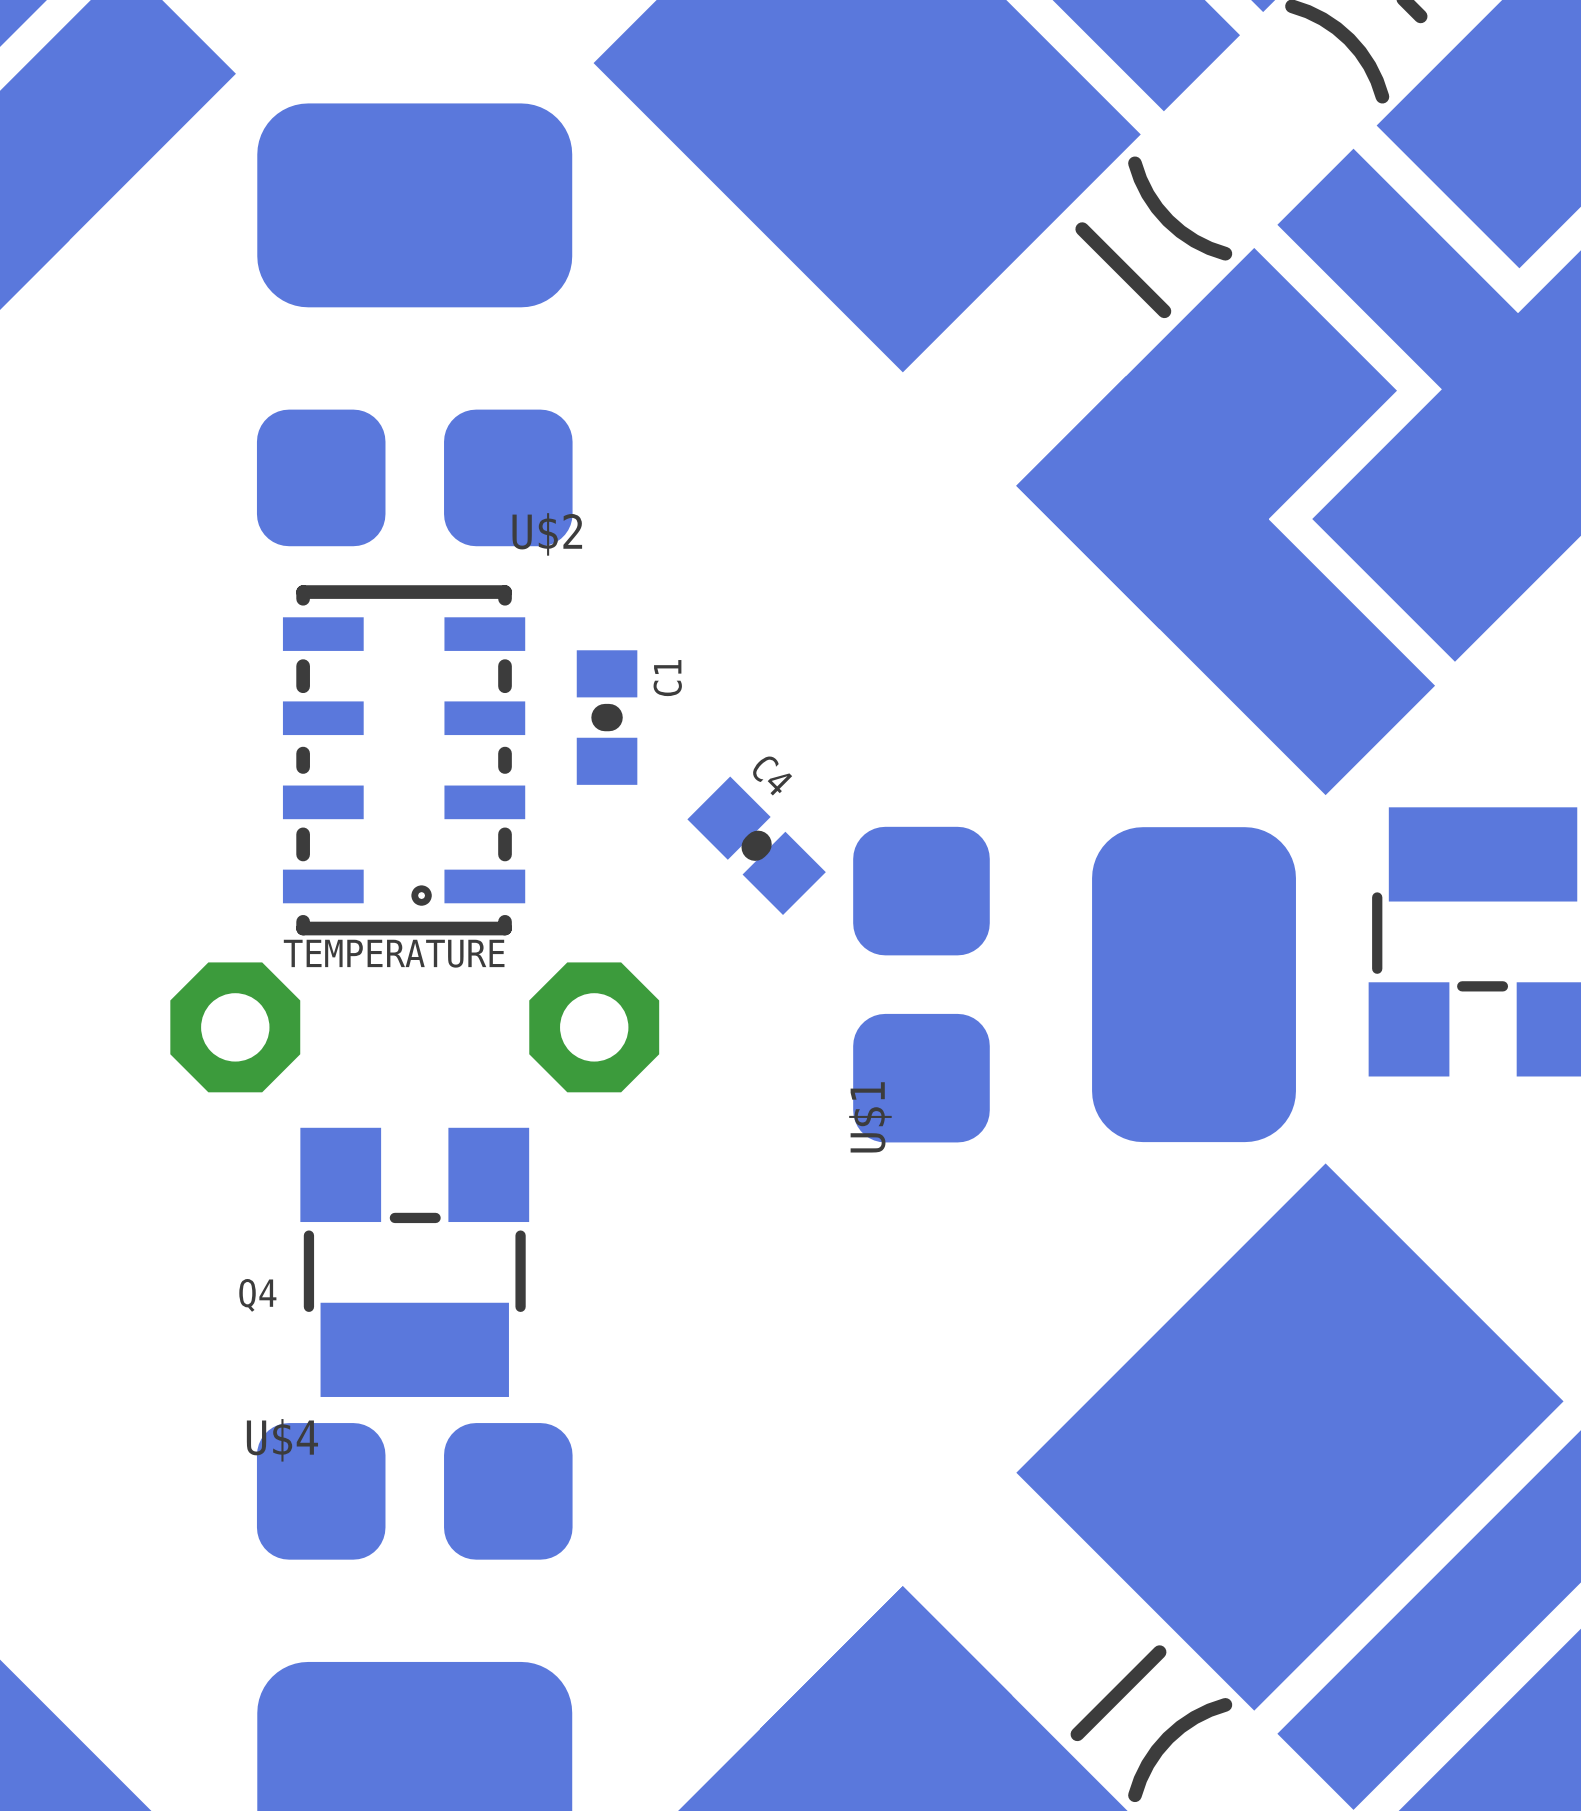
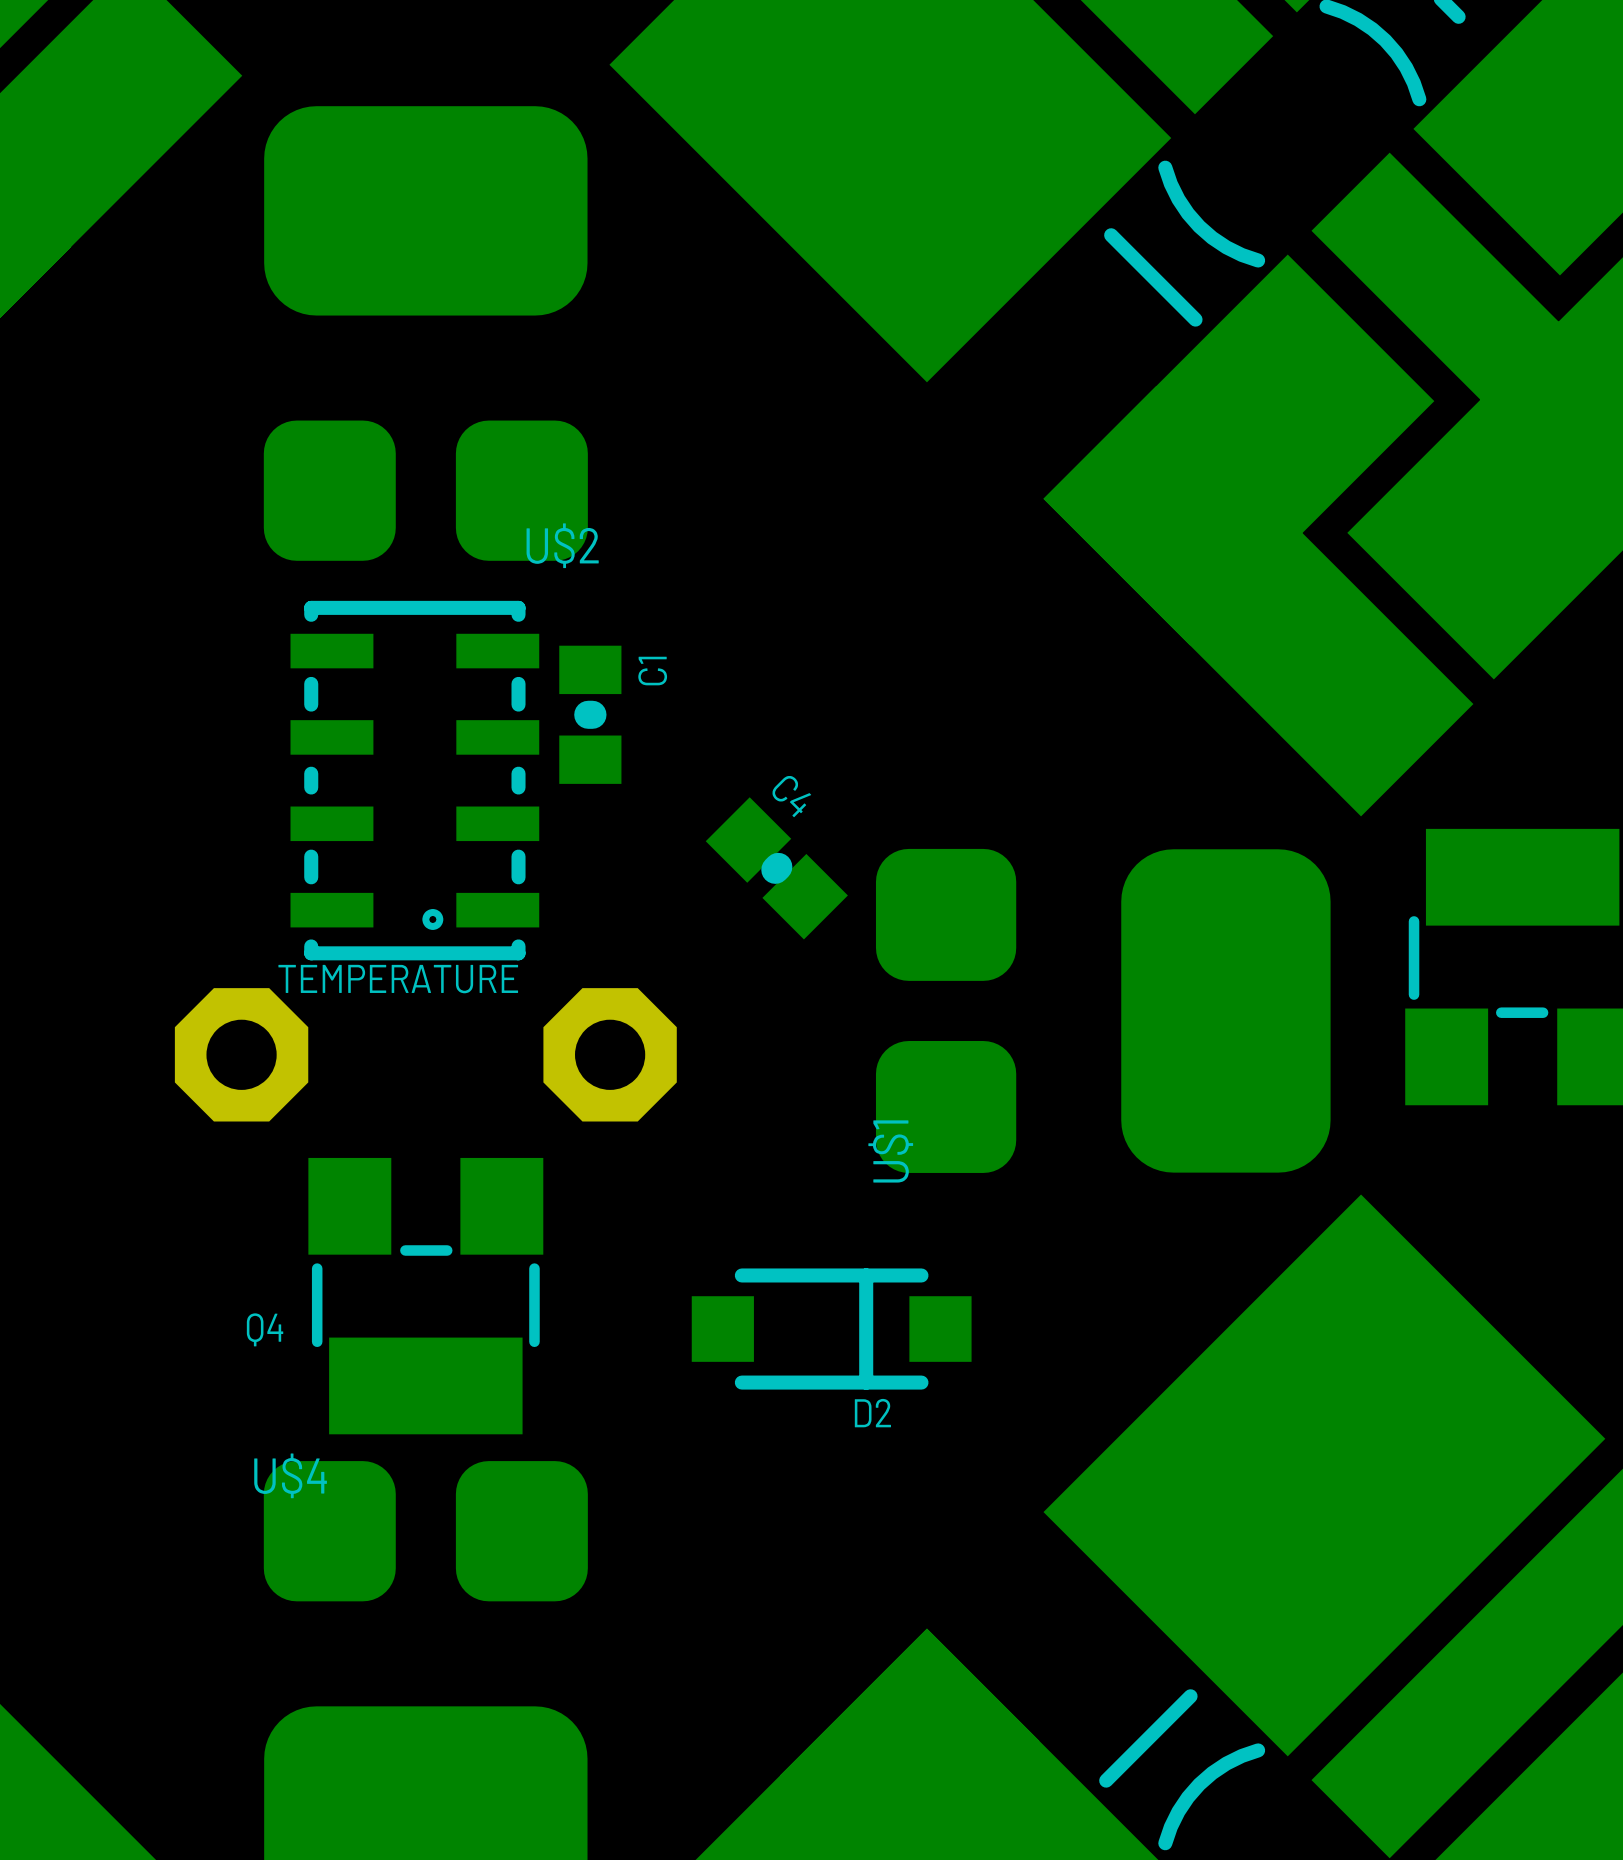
C1 position: (607, 717) -> (590, 714)
D2: none -> (831, 1329)

